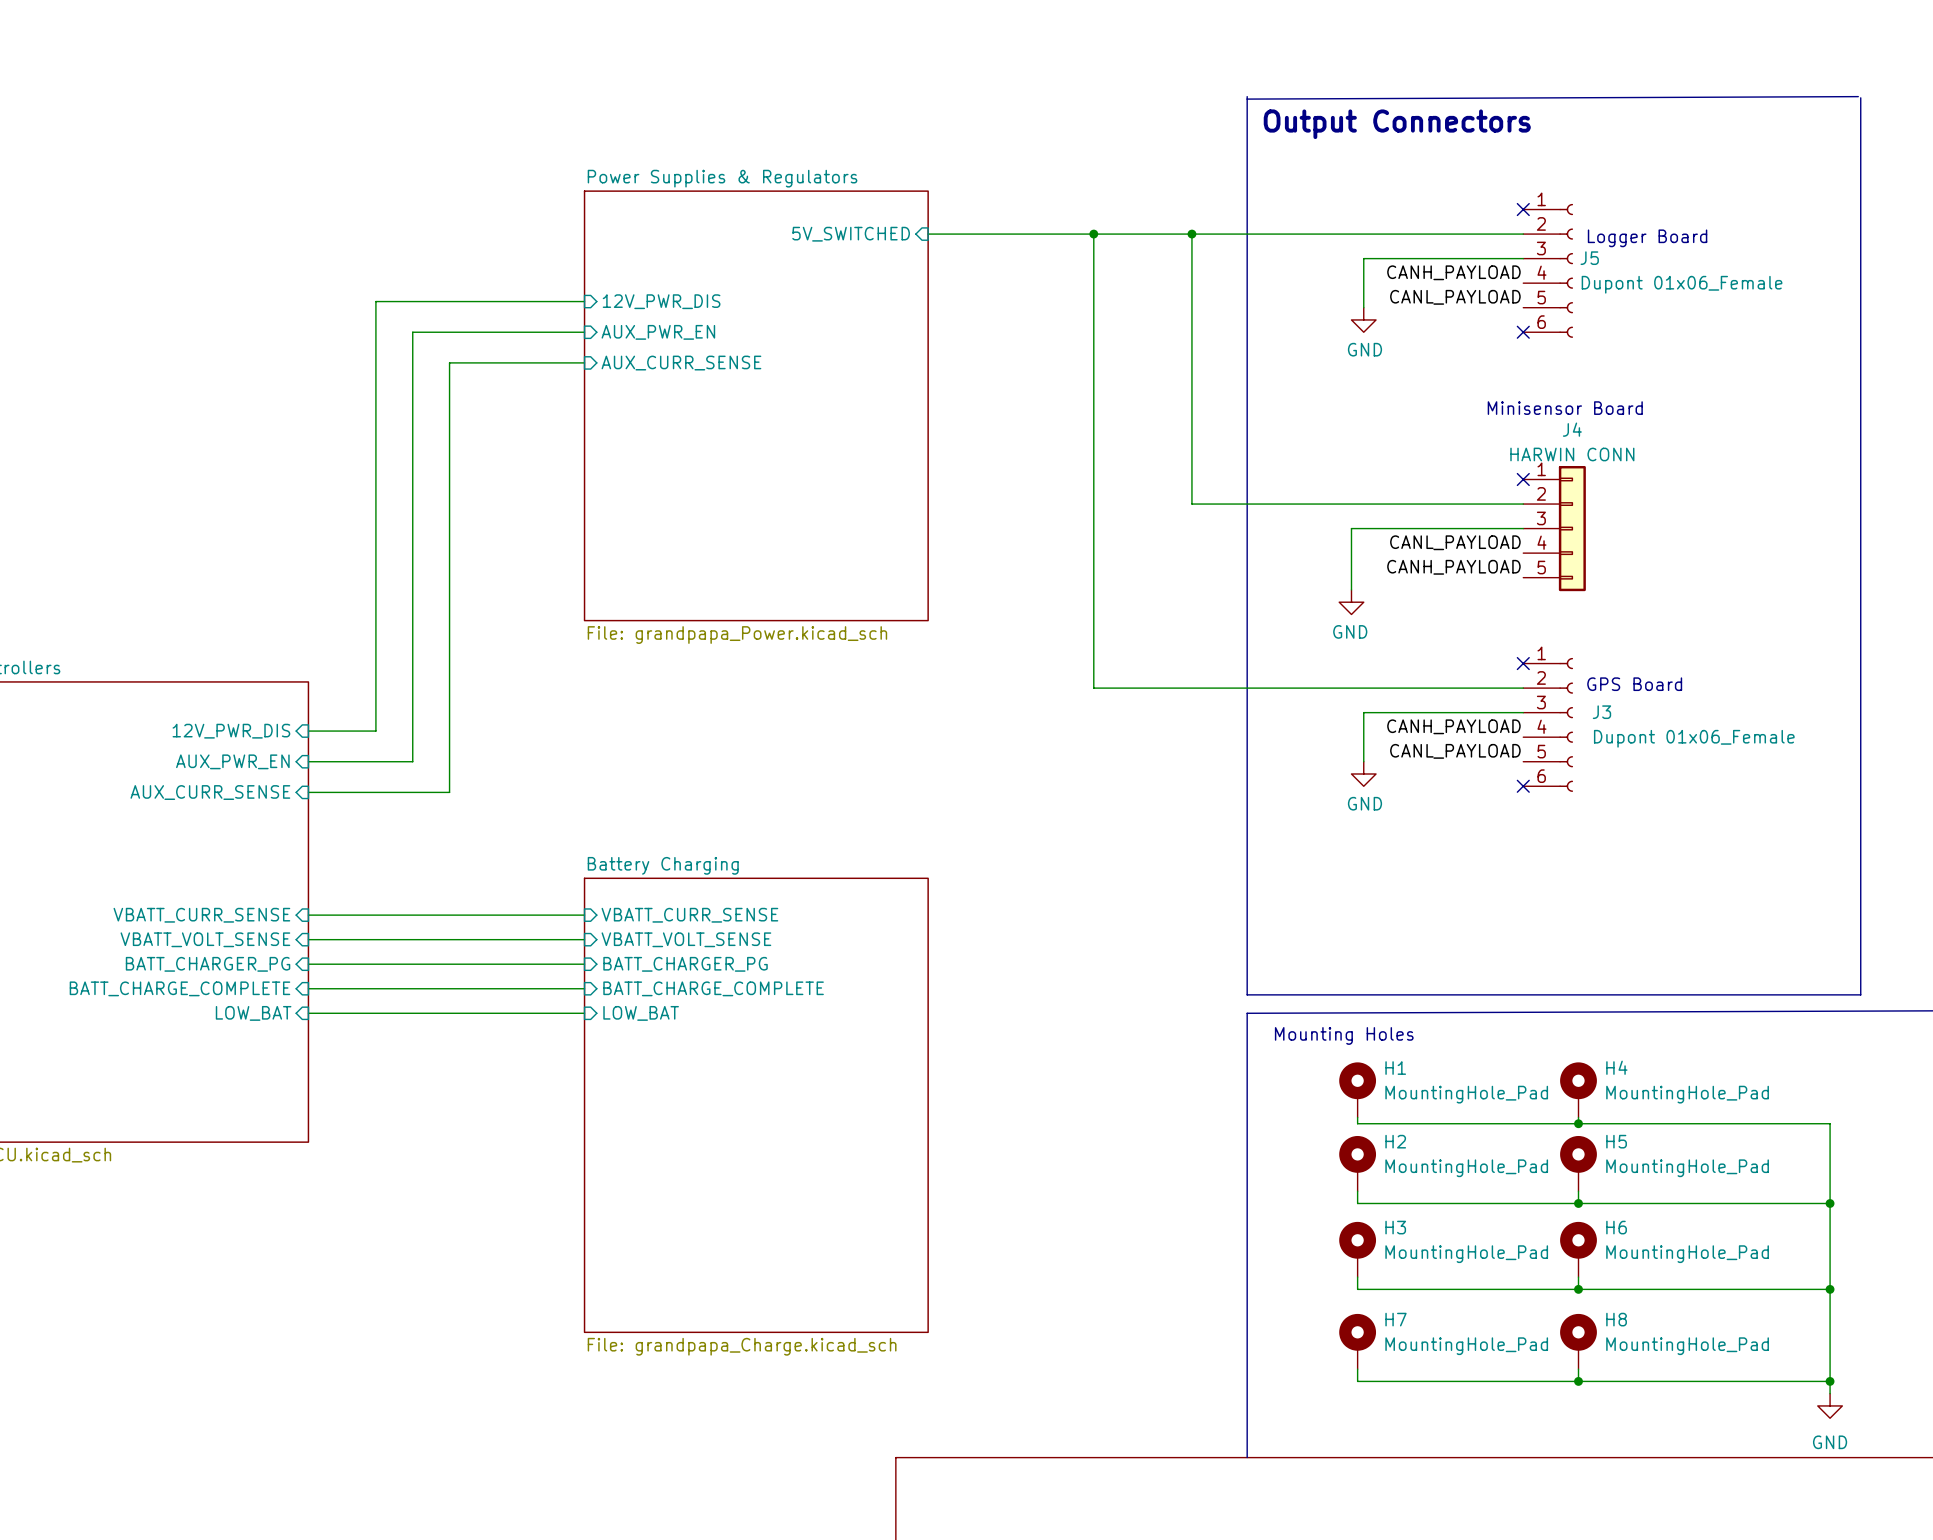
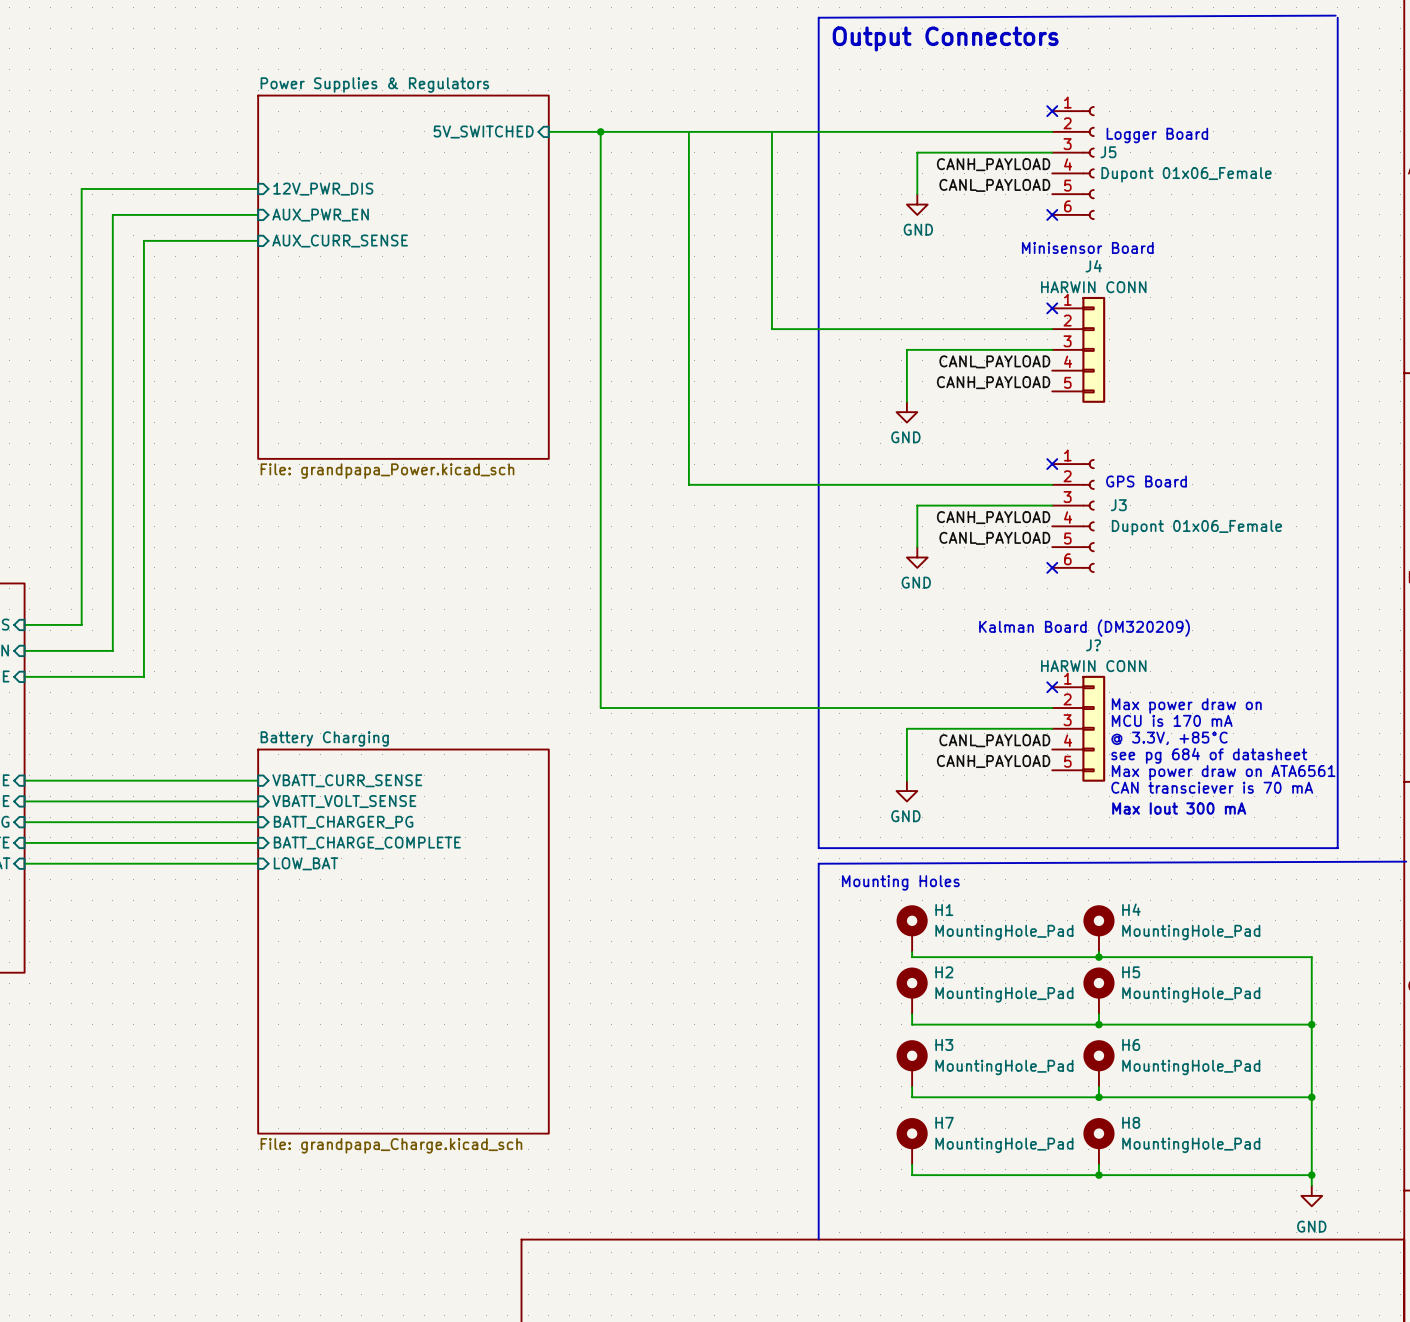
line: none -> (1335, 15) (818, 17) (818, 88)
line: none -> (1337, 17) (1337, 89)
line: (1858, 96) (1247, 99) -> none
no-connect mark: none -> (1052, 111)
text position: Output Connectors (1397, 124) -> Output Connectors (945, 38)
wire: none -> (600, 131) (600, 708) (1052, 708)
junction: none -> (600, 131)
wire: none -> (688, 131) (688, 204)
wire: none -> (771, 131) (771, 204)
label: none -> CANH_PAYLOAD (993, 164)
no-connect mark position: (1523, 209) -> (1052, 214)
label: none -> CANL_PAYLOAD (994, 185)
sheet pin position: 5V_SWITCHED (851, 234) -> 5V_SWITCHED (483, 132)
wire: (928, 234) (1523, 234) -> (548, 131) (1052, 131)
junction: (1093, 234) -> none
junction: (1191, 234) -> none
power symbol: none -> GND (917, 204)
text position: Logger Board (1647, 238) -> Logger Board (1157, 135)
wire: (1523, 258) (1363, 258) (1363, 307) -> (1052, 152) (917, 152) (917, 194)
J5 position: (1548, 270) -> (1073, 163)
label: CANH_PAYLOAD (1453, 272) -> none
label: CANL_PAYLOAD (1455, 297) -> none
wire: (375, 301) (584, 301) -> (81, 261) (81, 188) (258, 188)
sheet pin position: 12V_PWR_DIS (661, 301) -> 12V_PWR_DIS (323, 189)
power symbol: GND (1363, 319) -> none
wire: (412, 332) (584, 332) -> (112, 287) (112, 214) (258, 214)
sheet pin position: AUX_PWR_EN (658, 332) -> AUX_PWR_EN (320, 215)
no-connect mark position: (1523, 332) -> (1052, 308)
wire: (449, 362) (584, 362) -> (143, 313) (143, 240) (258, 240)
sheet pin position: AUX_CURR_SENSE (681, 363) -> AUX_CURR_SENSE (340, 240)
wire: (1191, 381) (1191, 504) (1523, 504) -> (771, 329) (1052, 329)
sheet Power Supplies & Regulators position: (756, 405) -> (403, 277)
text position: Minisensor Board (1565, 408) -> Minisensor Board (1087, 247)
label: none -> CANL_PAYLOAD (994, 361)
label: none -> CANH_PAYLOAD (993, 382)
power symbol: none -> GND (906, 412)
no-connect mark: (1523, 479) -> none
wire: (1523, 528) (1351, 528) (1351, 589) -> (1052, 349) (906, 349) (906, 401)
J4 position: (1554, 528) -> (1078, 349)
no-connect mark: none -> (1052, 464)
label: CANL_PAYLOAD (1455, 542) -> none
wire: (1093, 565) (1093, 688) (1523, 688) -> (688, 484) (1052, 484)
label position: CANH_PAYLOAD (1453, 567) -> CANH_PAYLOAD (993, 517)
power symbol position: GND (1351, 602) -> GND (917, 557)
label: none -> CANL_PAYLOAD (994, 538)
text position: GPS Board (1634, 684) -> GPS Board (1146, 481)
wire: (1523, 712) (1363, 712) (1363, 761) -> (1052, 505) (917, 505) (917, 547)
J3 position: (1548, 724) -> (1073, 515)
label: CANH_PAYLOAD (1453, 726) -> none
text: none -> Kalman Board (DM320209) (1084, 628)
label: CANL_PAYLOAD (1455, 751) -> none
power symbol: GND (1363, 774) -> none
no-connect mark position: (1523, 786) -> (1052, 687)
text: none -> Max power draw on (1186, 705)
text: none -> MCU is 170 mA (1172, 720)
wire: none -> (1052, 728) (906, 728) (906, 780)
J?: none -> HARWIN CONN (1078, 728)
text: none -> @ 3.3V, +85°C (1169, 738)
label: none -> CANL_PAYLOAD (994, 740)
text: none -> see pg 684 of datasheet (1209, 755)
label: none -> CANH_PAYLOAD (993, 761)
text: none -> Max power draw on ATA6561 (1223, 772)
text: none -> CAN transciever is 70 mA (1212, 787)
power symbol: none -> GND (906, 791)
text: none -> Max Iout 300 mA (1179, 808)

